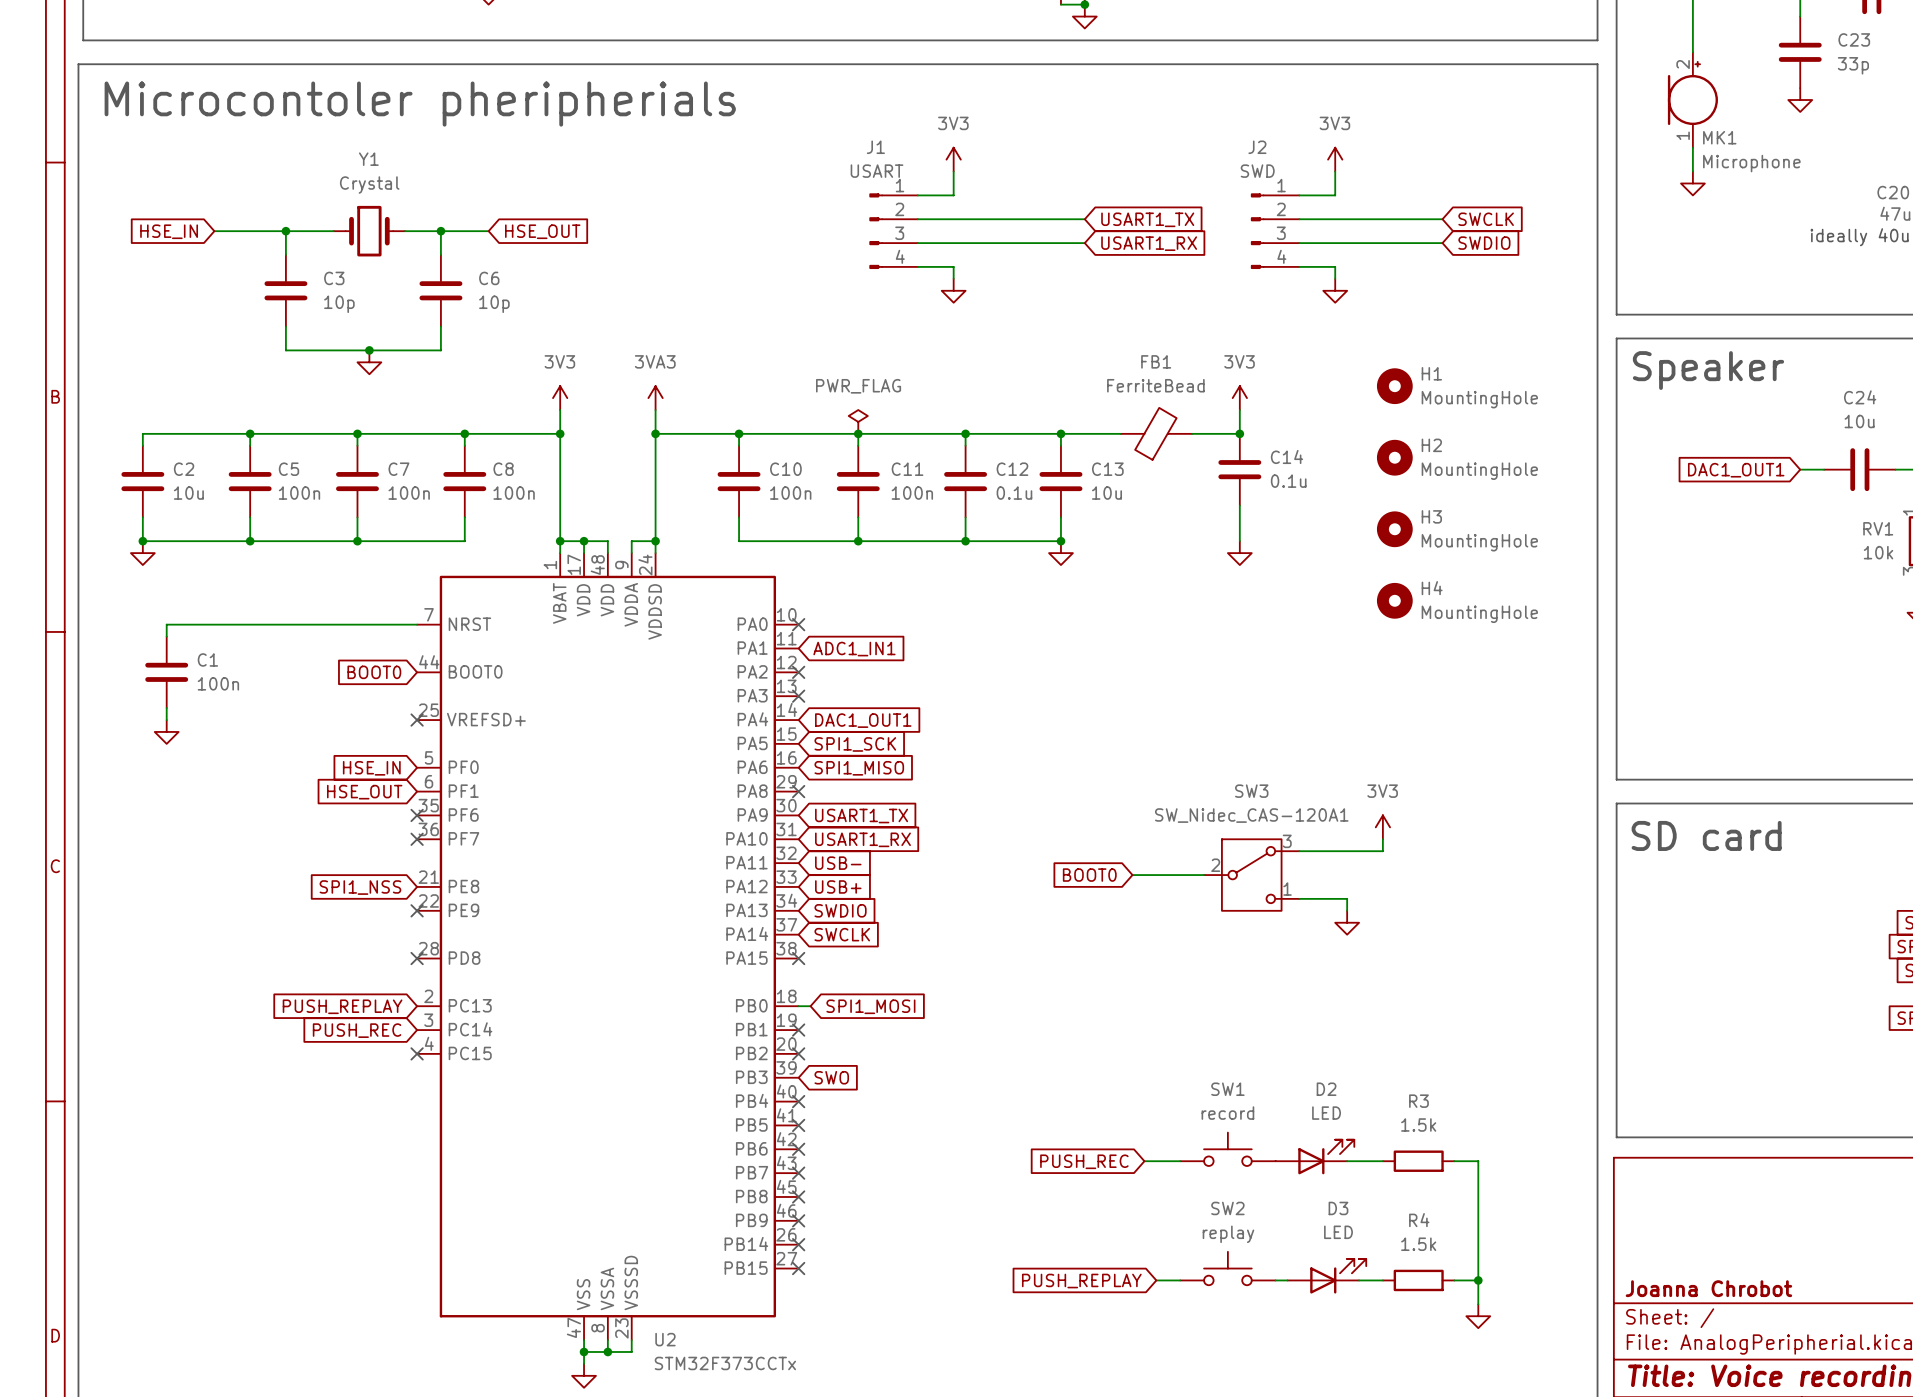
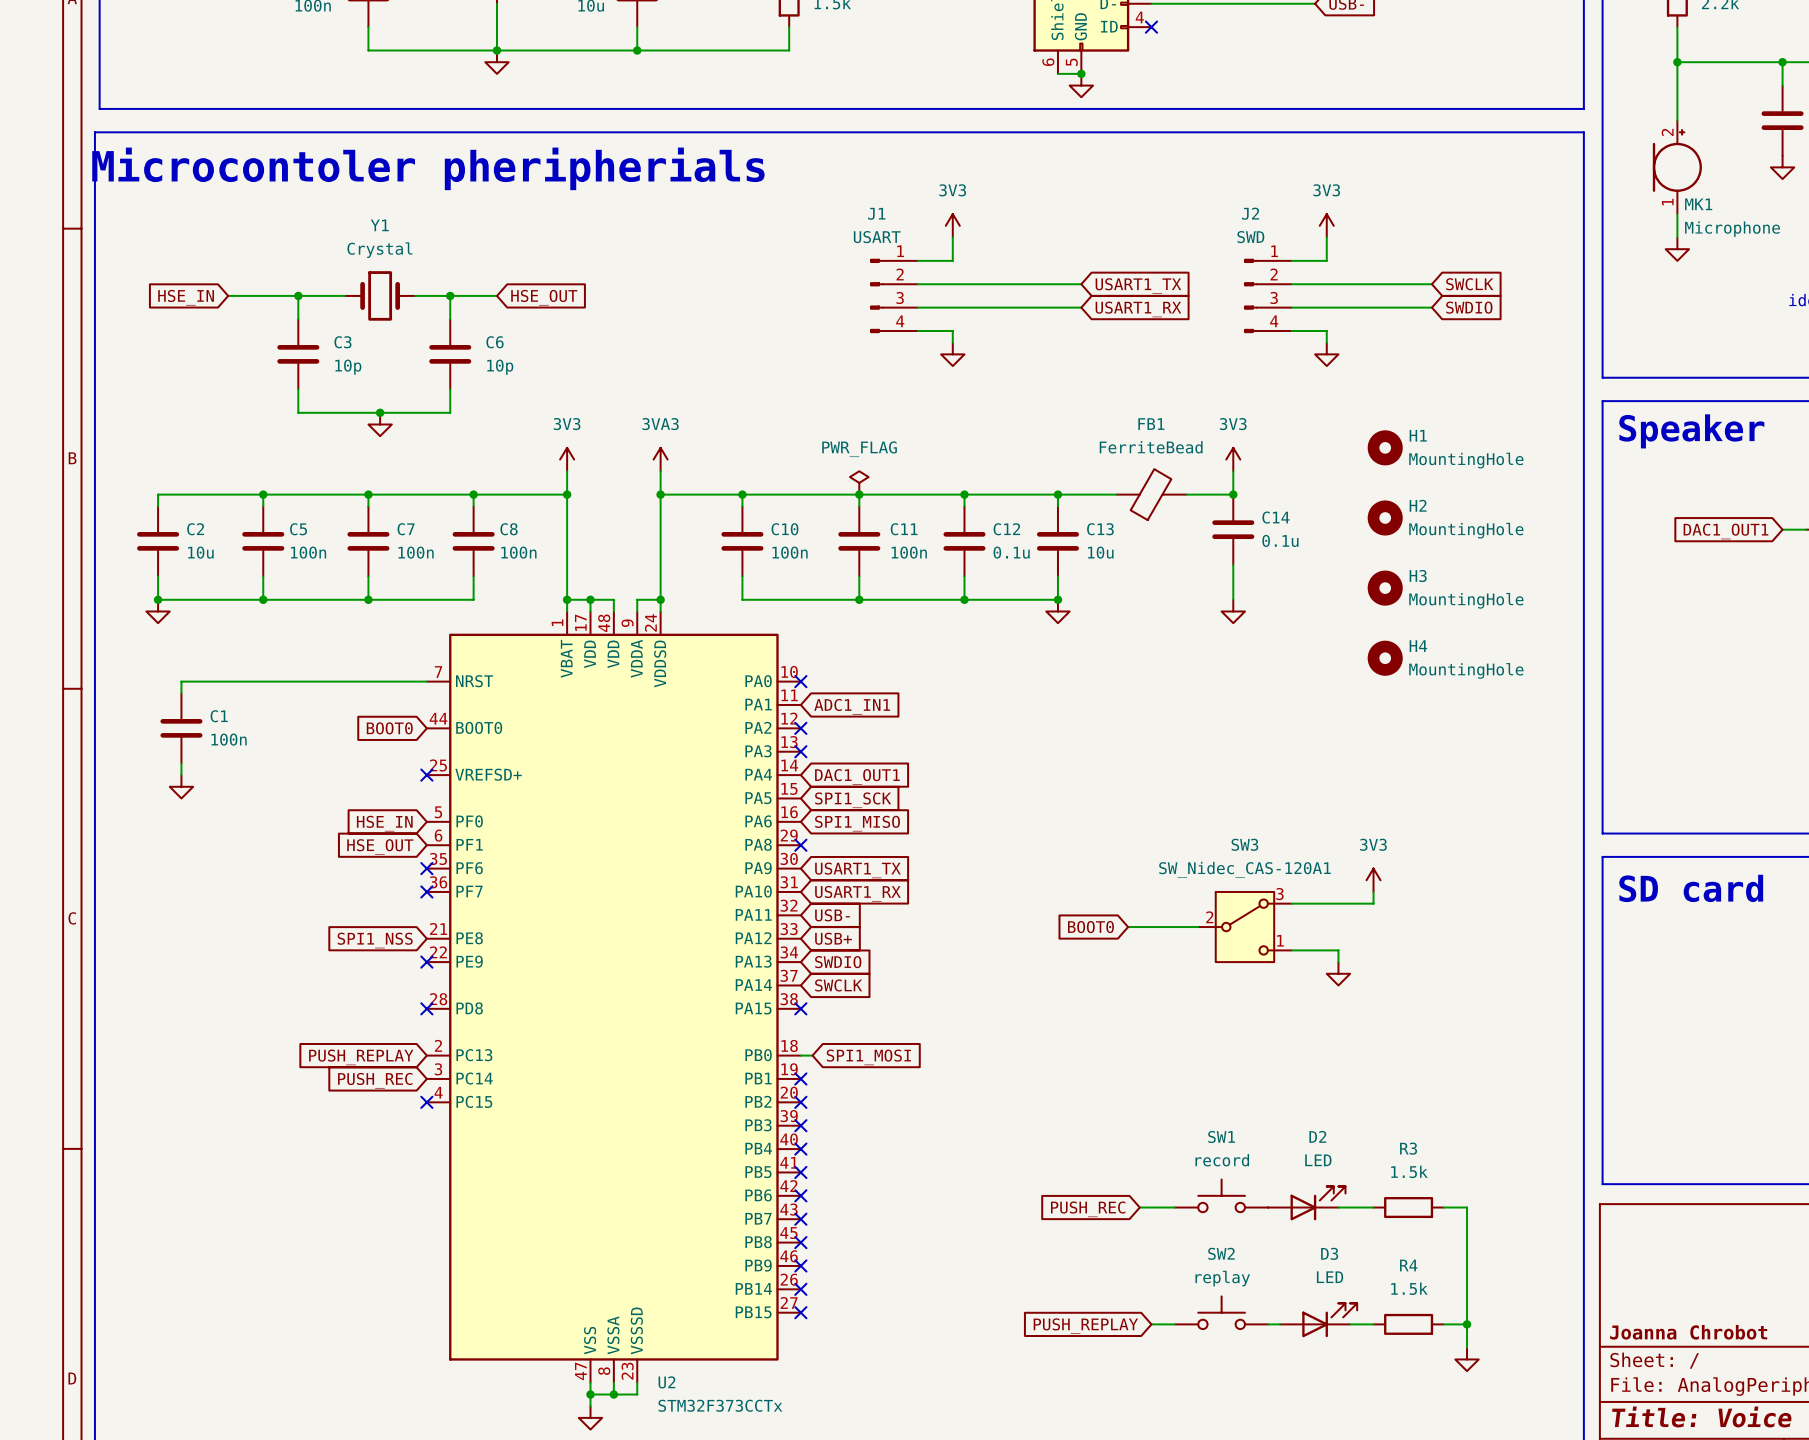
no-connect mark: none -> (800, 1125)
global label: SWO (831, 1077) -> none

